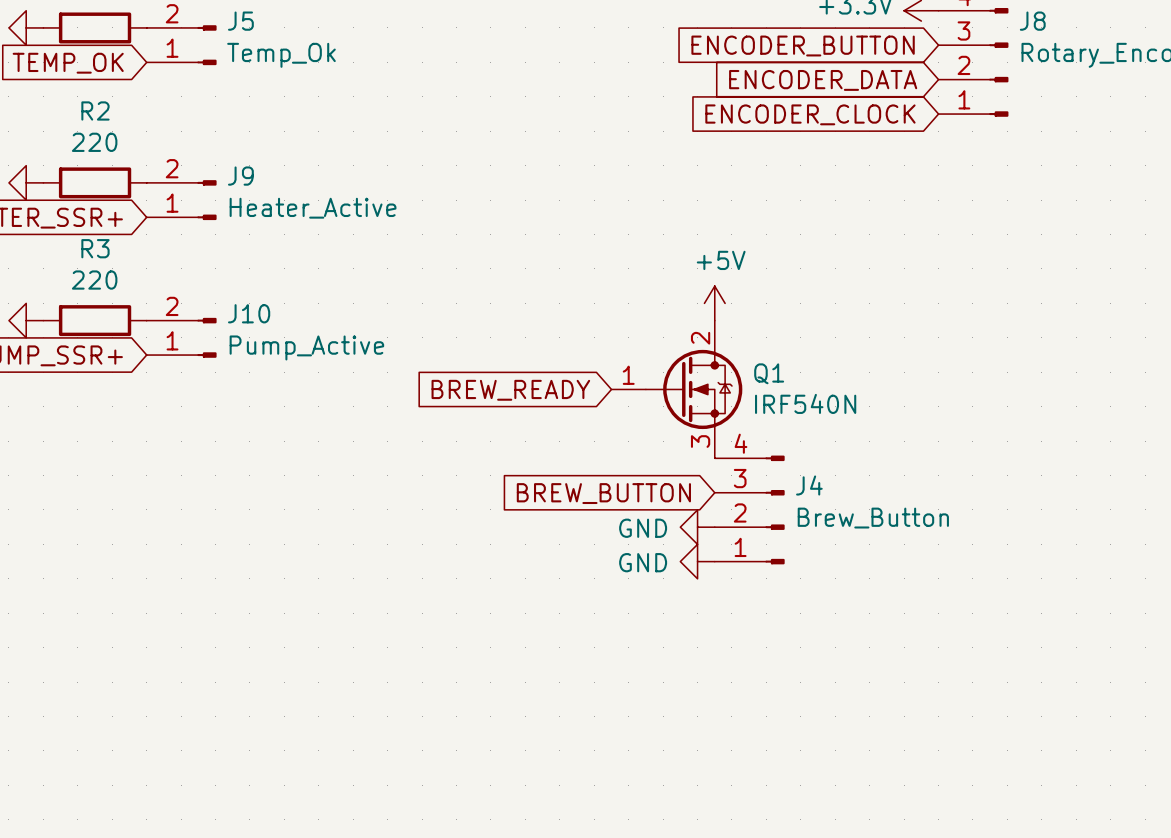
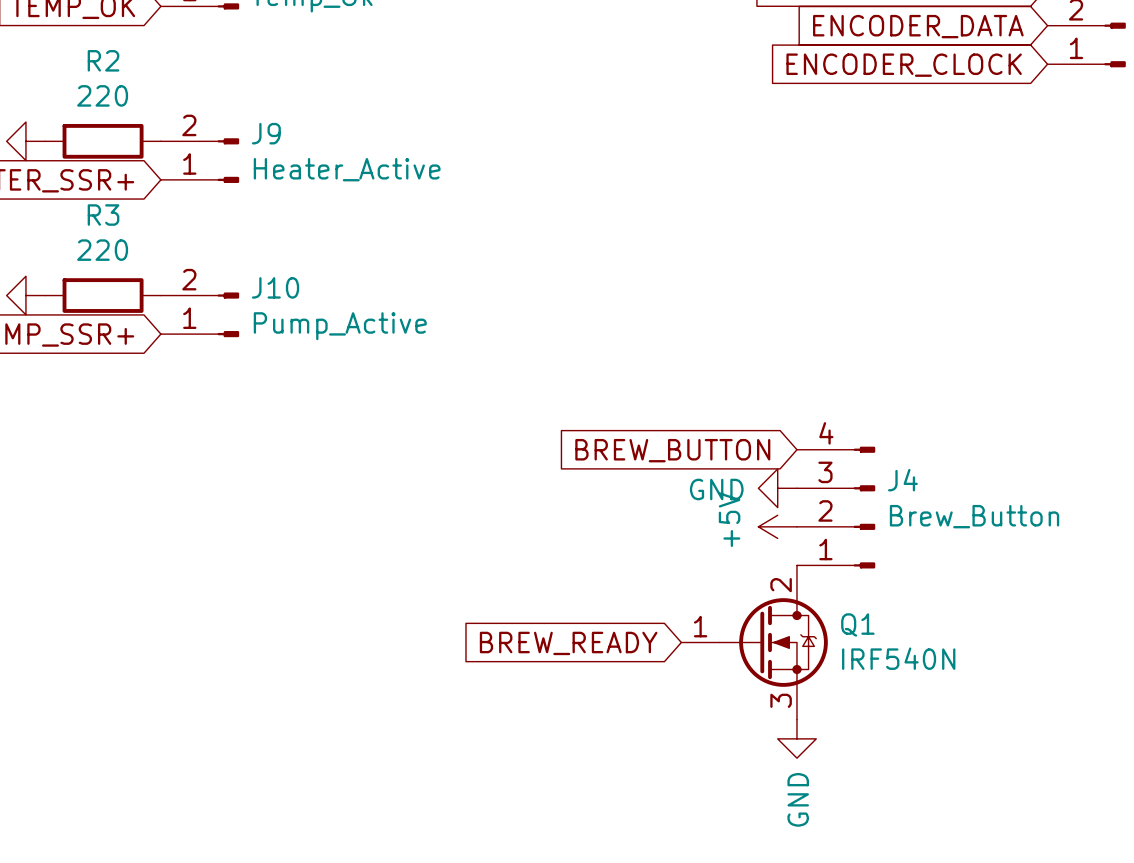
power symbol: +5V (714, 303) -> none
Q1 position: (676, 389) -> (754, 642)
global label position: BREW_READY (510, 390) -> BREW_READY (568, 643)
global label position: BREW_BUTTON (603, 493) -> BREW_BUTTON (672, 450)
power symbol: GND (697, 527) -> +5V (777, 526)
power symbol position: GND (697, 561) -> GND (777, 488)
power symbol: none -> GND (796, 738)

